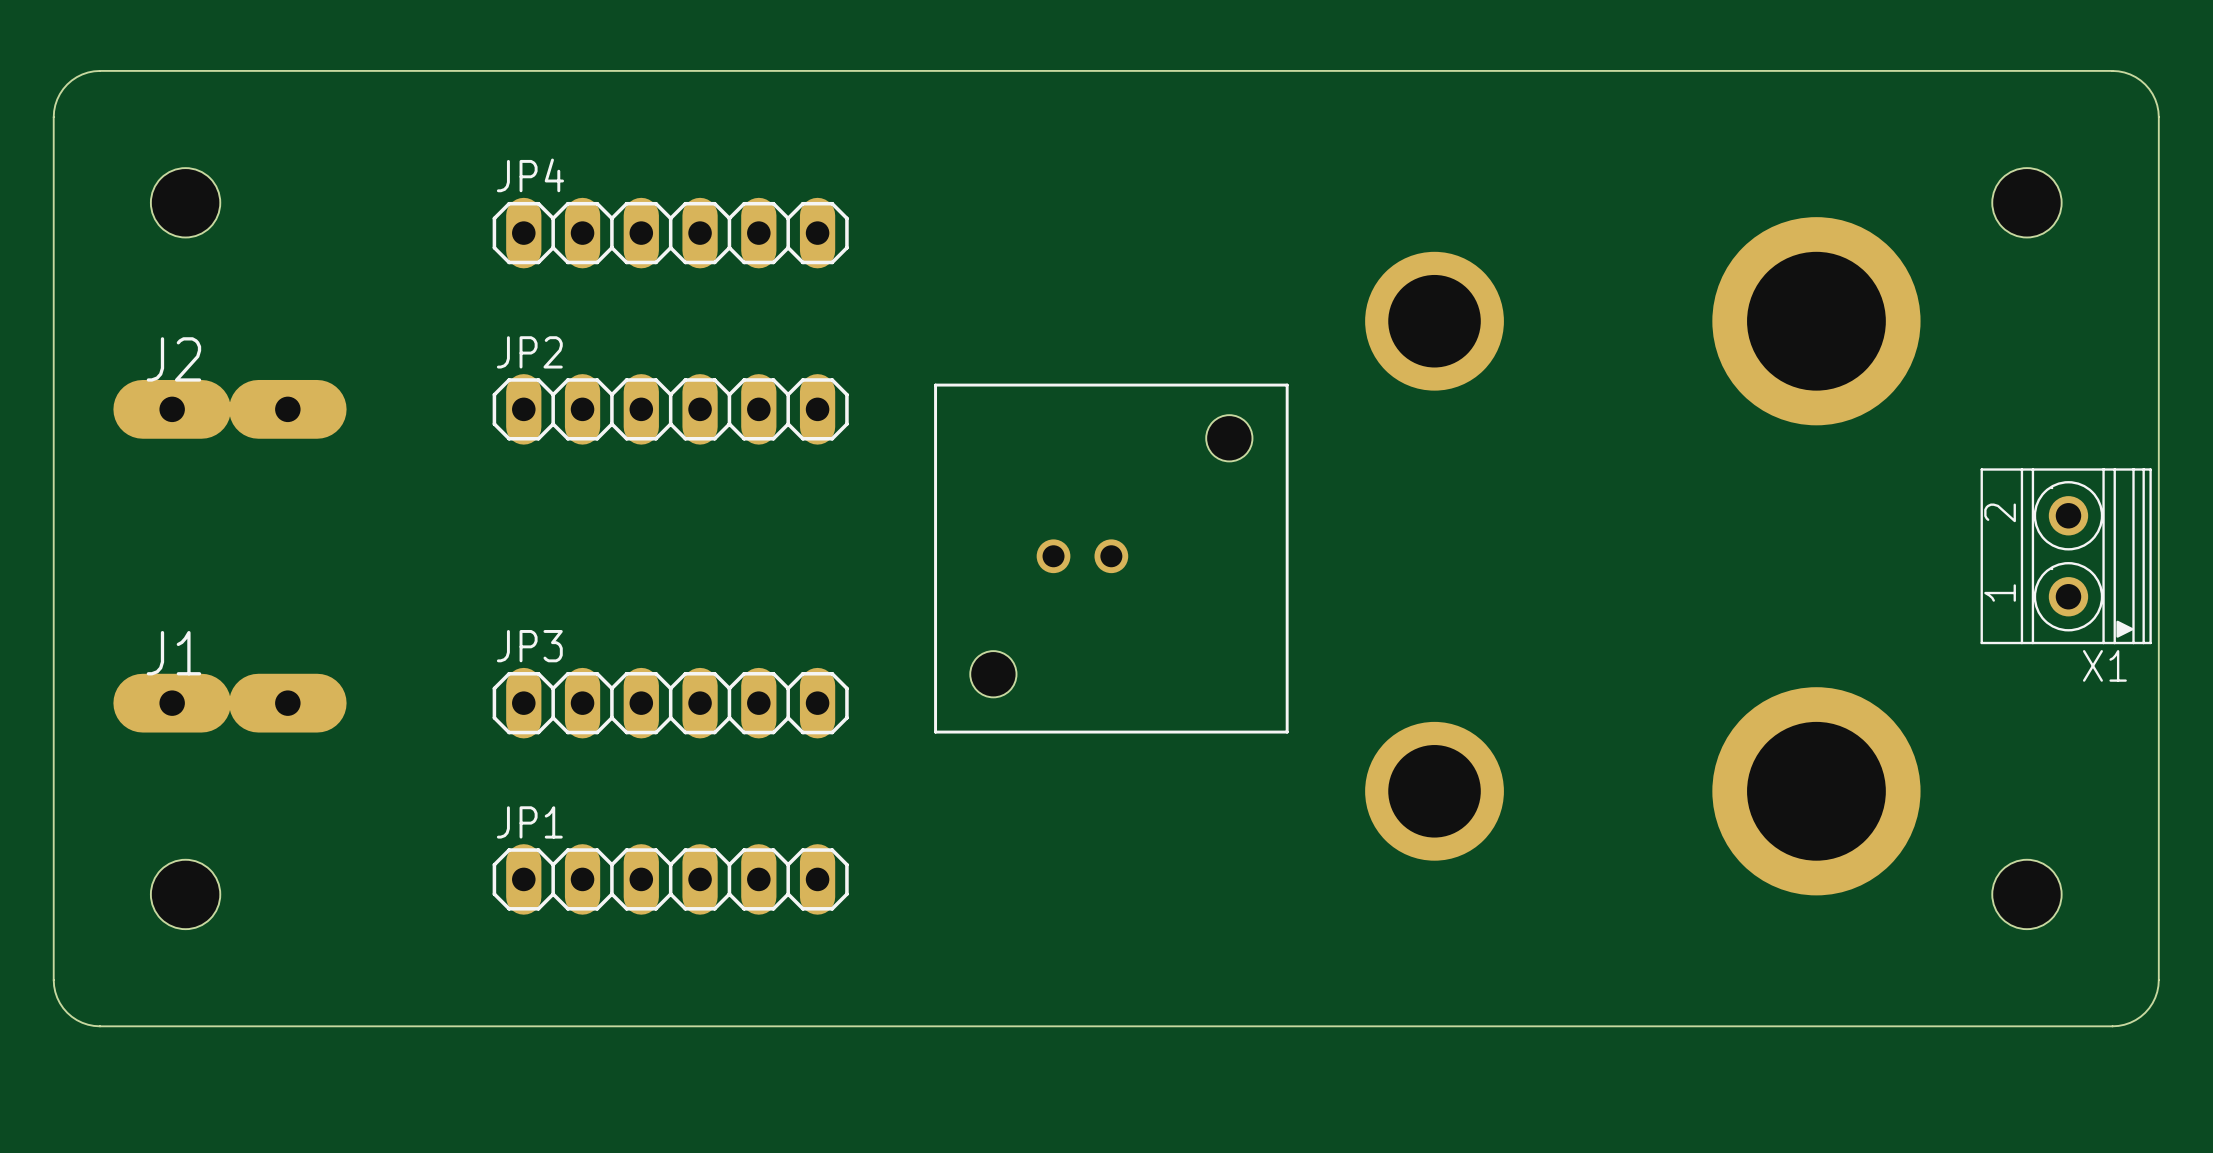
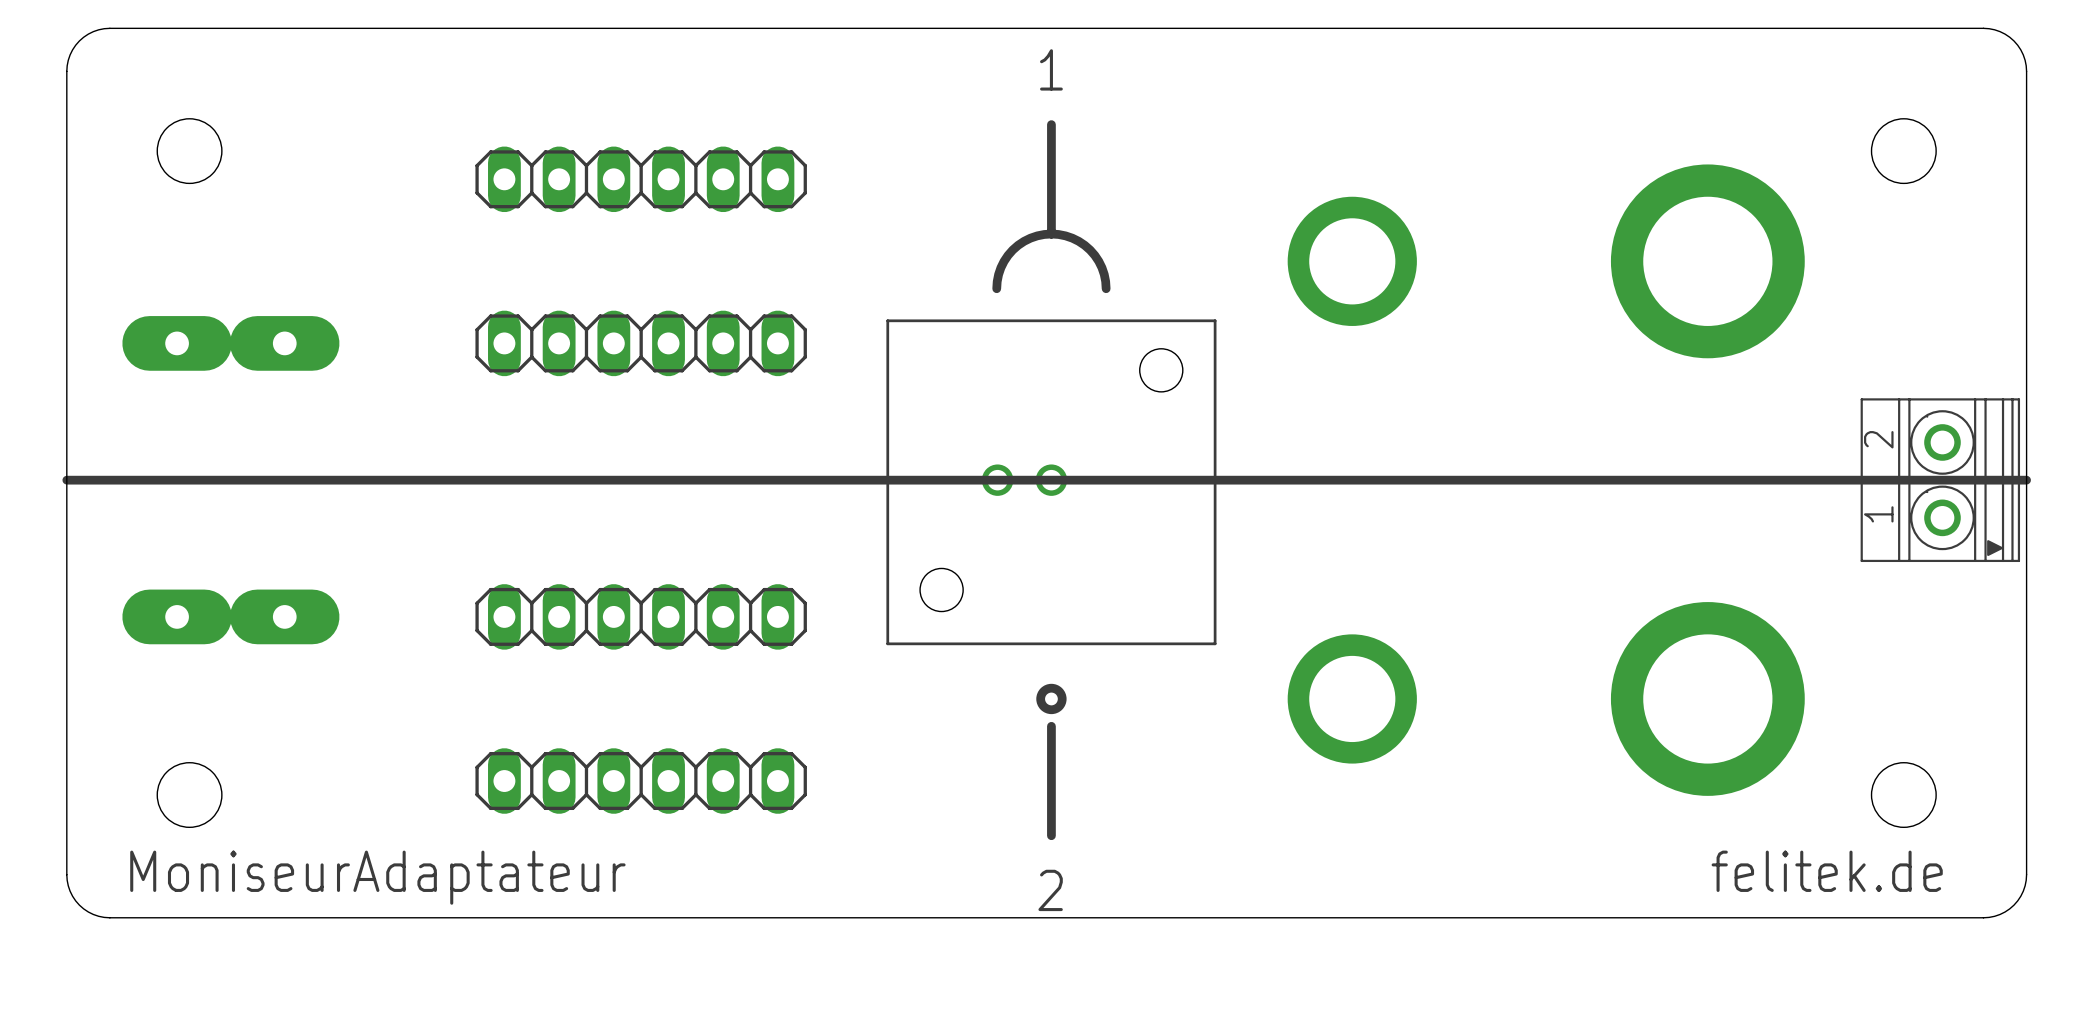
text: none -> 1 (1051, 69)
line: none -> (1051, 124) (1051, 234)
JP4 name: JP4 (530, 175) -> none
line: none -> (1051, 234) (1030, 238) (1012, 250) (1000, 267) (996, 288)
line: none -> (1051, 234) (1072, 238) (1090, 250) (1101, 267) (1106, 288)
JP2 name: JP2 (529, 352) -> none
J2 name: J2 (173, 359) -> none
line: none -> (66, 480) (2026, 480)
JP3 name: JP3 (529, 646) -> none
J1 name: J1 (173, 653) -> none
X1 name: X1 (2104, 665) -> none
drawing: none -> [1036, 683, 1067, 715]
line: none -> (1051, 726) (1051, 835)
JP1 name: JP1 (529, 822) -> none
text: none -> felitek.de (1827, 871)
text: none -> MoniseurAdaptateur (377, 877)
text: none -> 2 (1050, 890)

